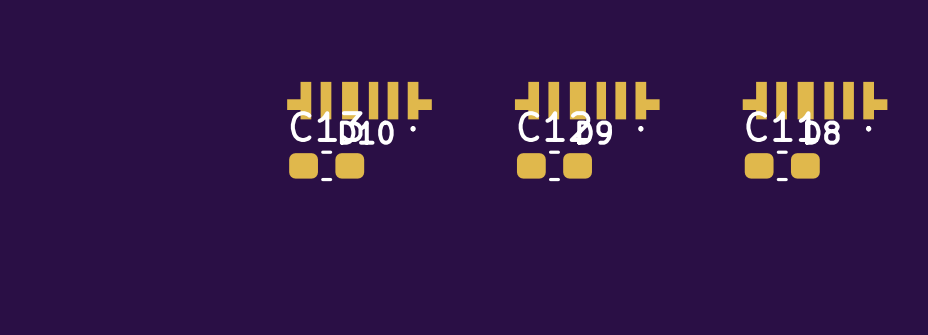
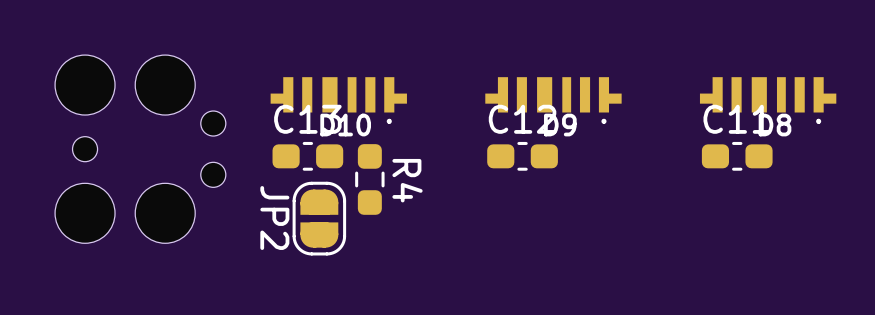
part: none -> (140, 149)
R4: none -> (369, 179)
JP2: none -> (319, 218)

